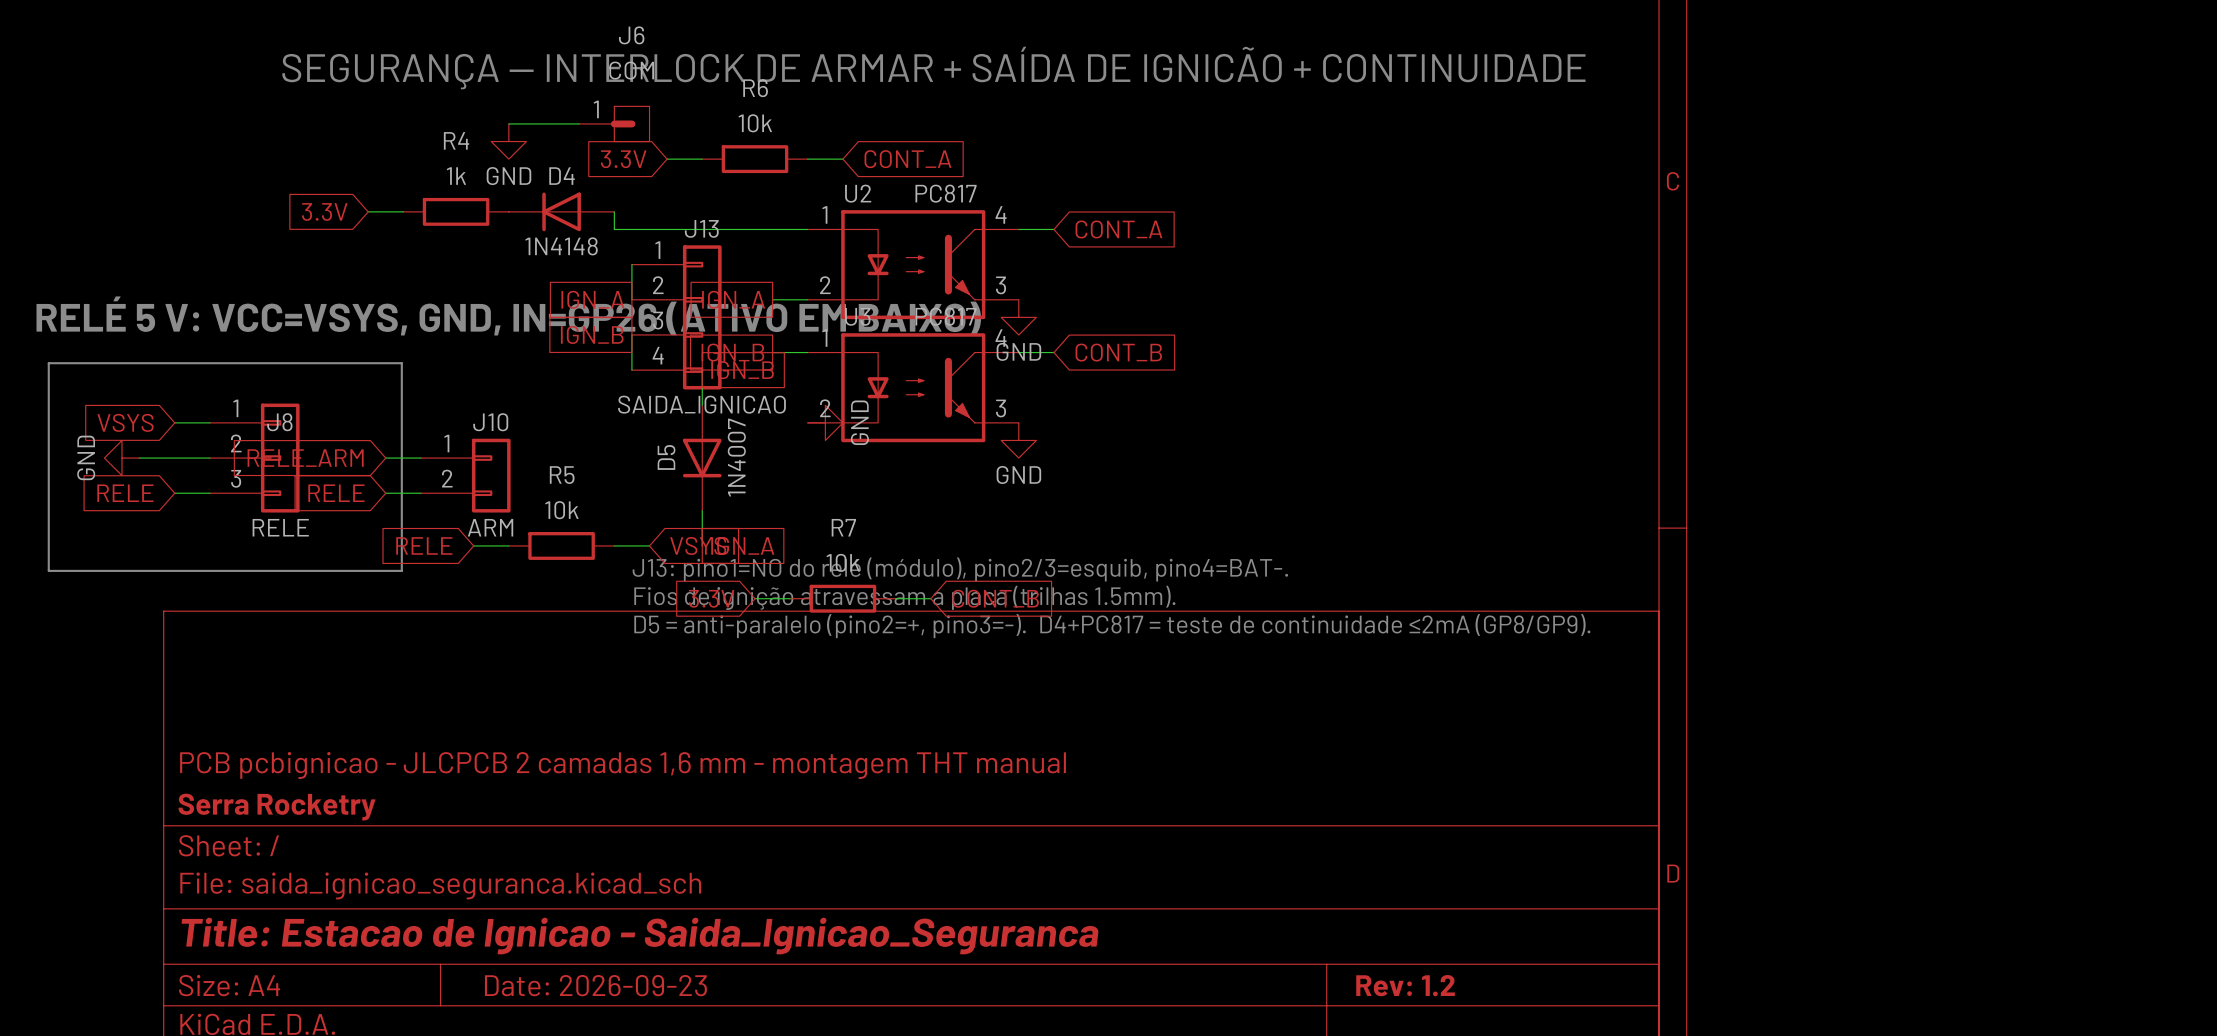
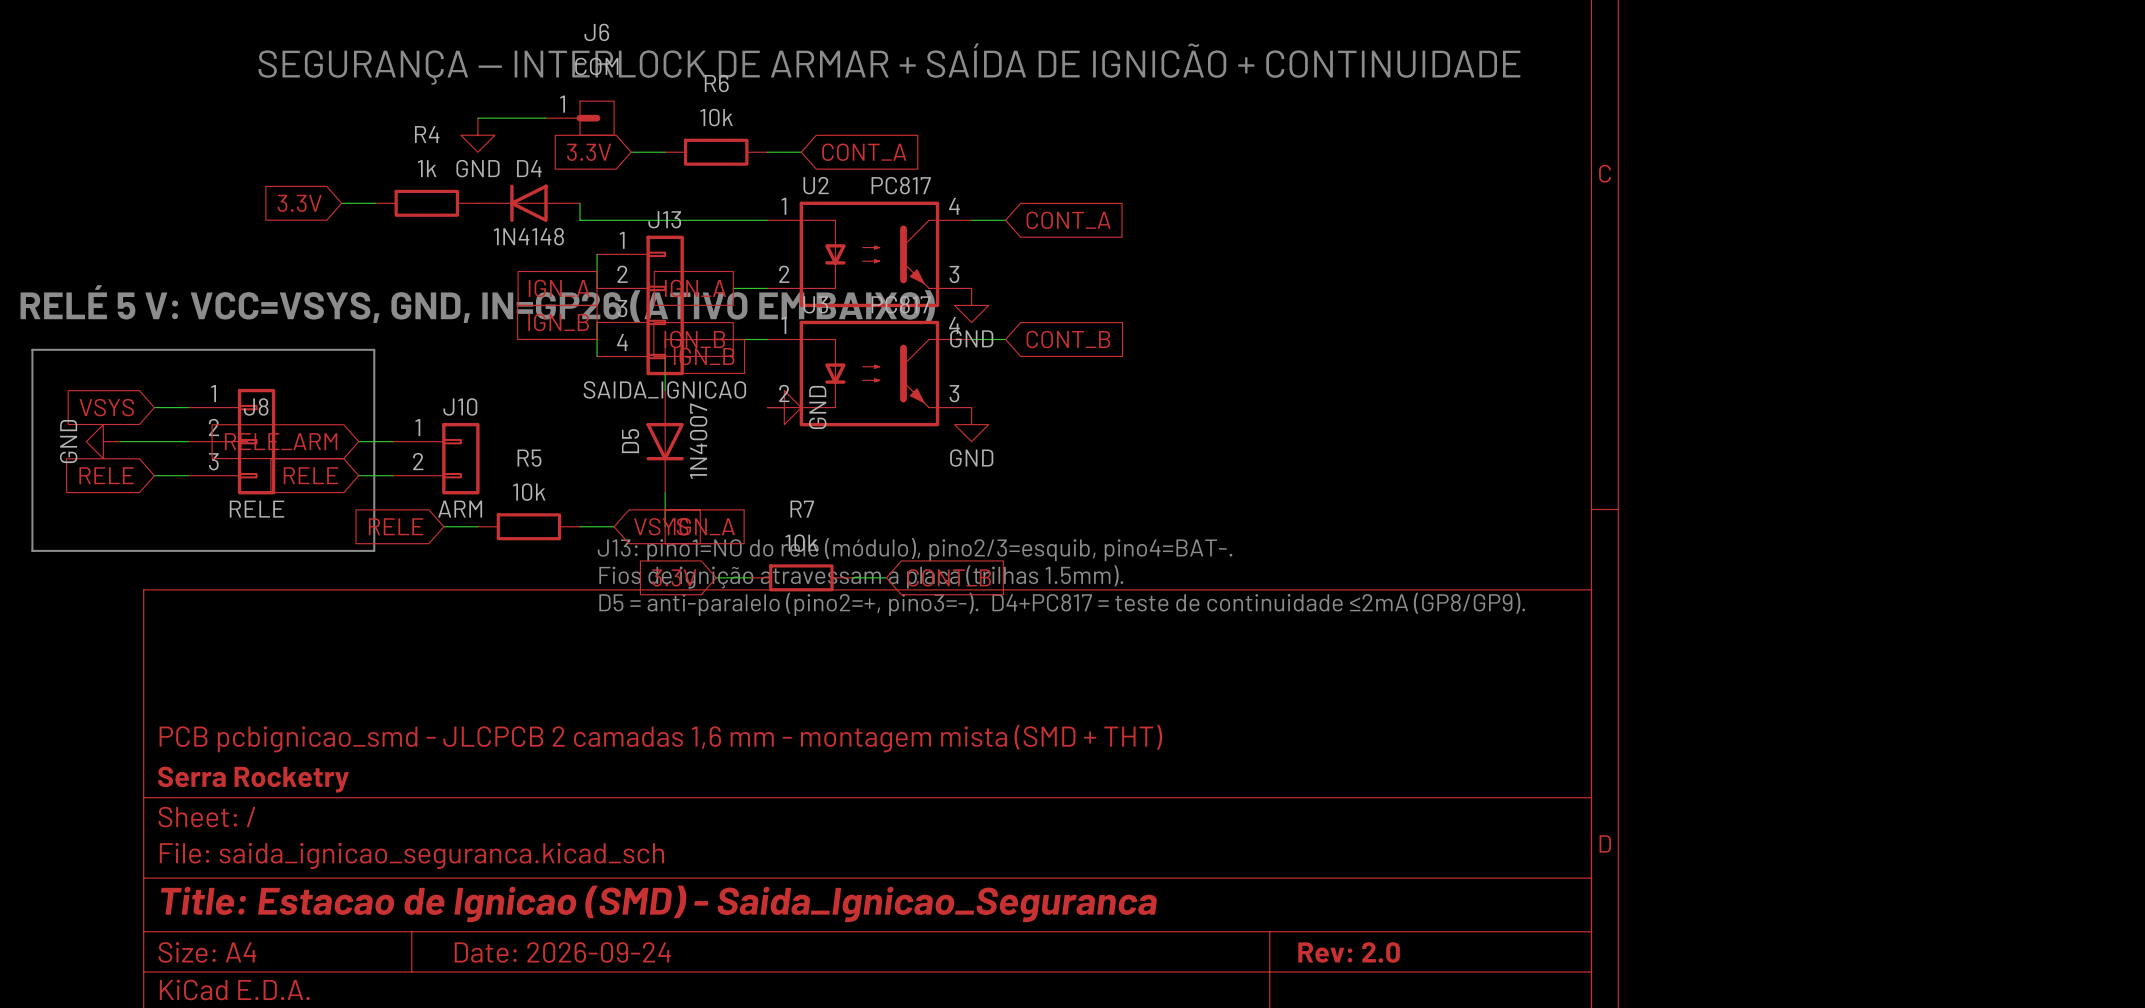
title block: PCB pcbignicao - JLCPCB 2 camadas 1,6 mm - montagem THT manual (623, 765) -> PCB pcbignicao_smd - JLCPCB 2 camadas 1,6 mm - montagem mista (SMD + THT) (660, 738)
title block: Title: Estacao de Ignicao - Saida_Ignicao_Seguranca (640, 936) -> Title: Estacao de Ignicao (SMD) - Saida_Ignicao_Seguranca (658, 903)
title block: Date: 2026-09-23 (595, 985) -> Date: 2026-09-24 (562, 952)
title block: Rev: 1.2 (1405, 985) -> Rev: 2.0 (1349, 952)

